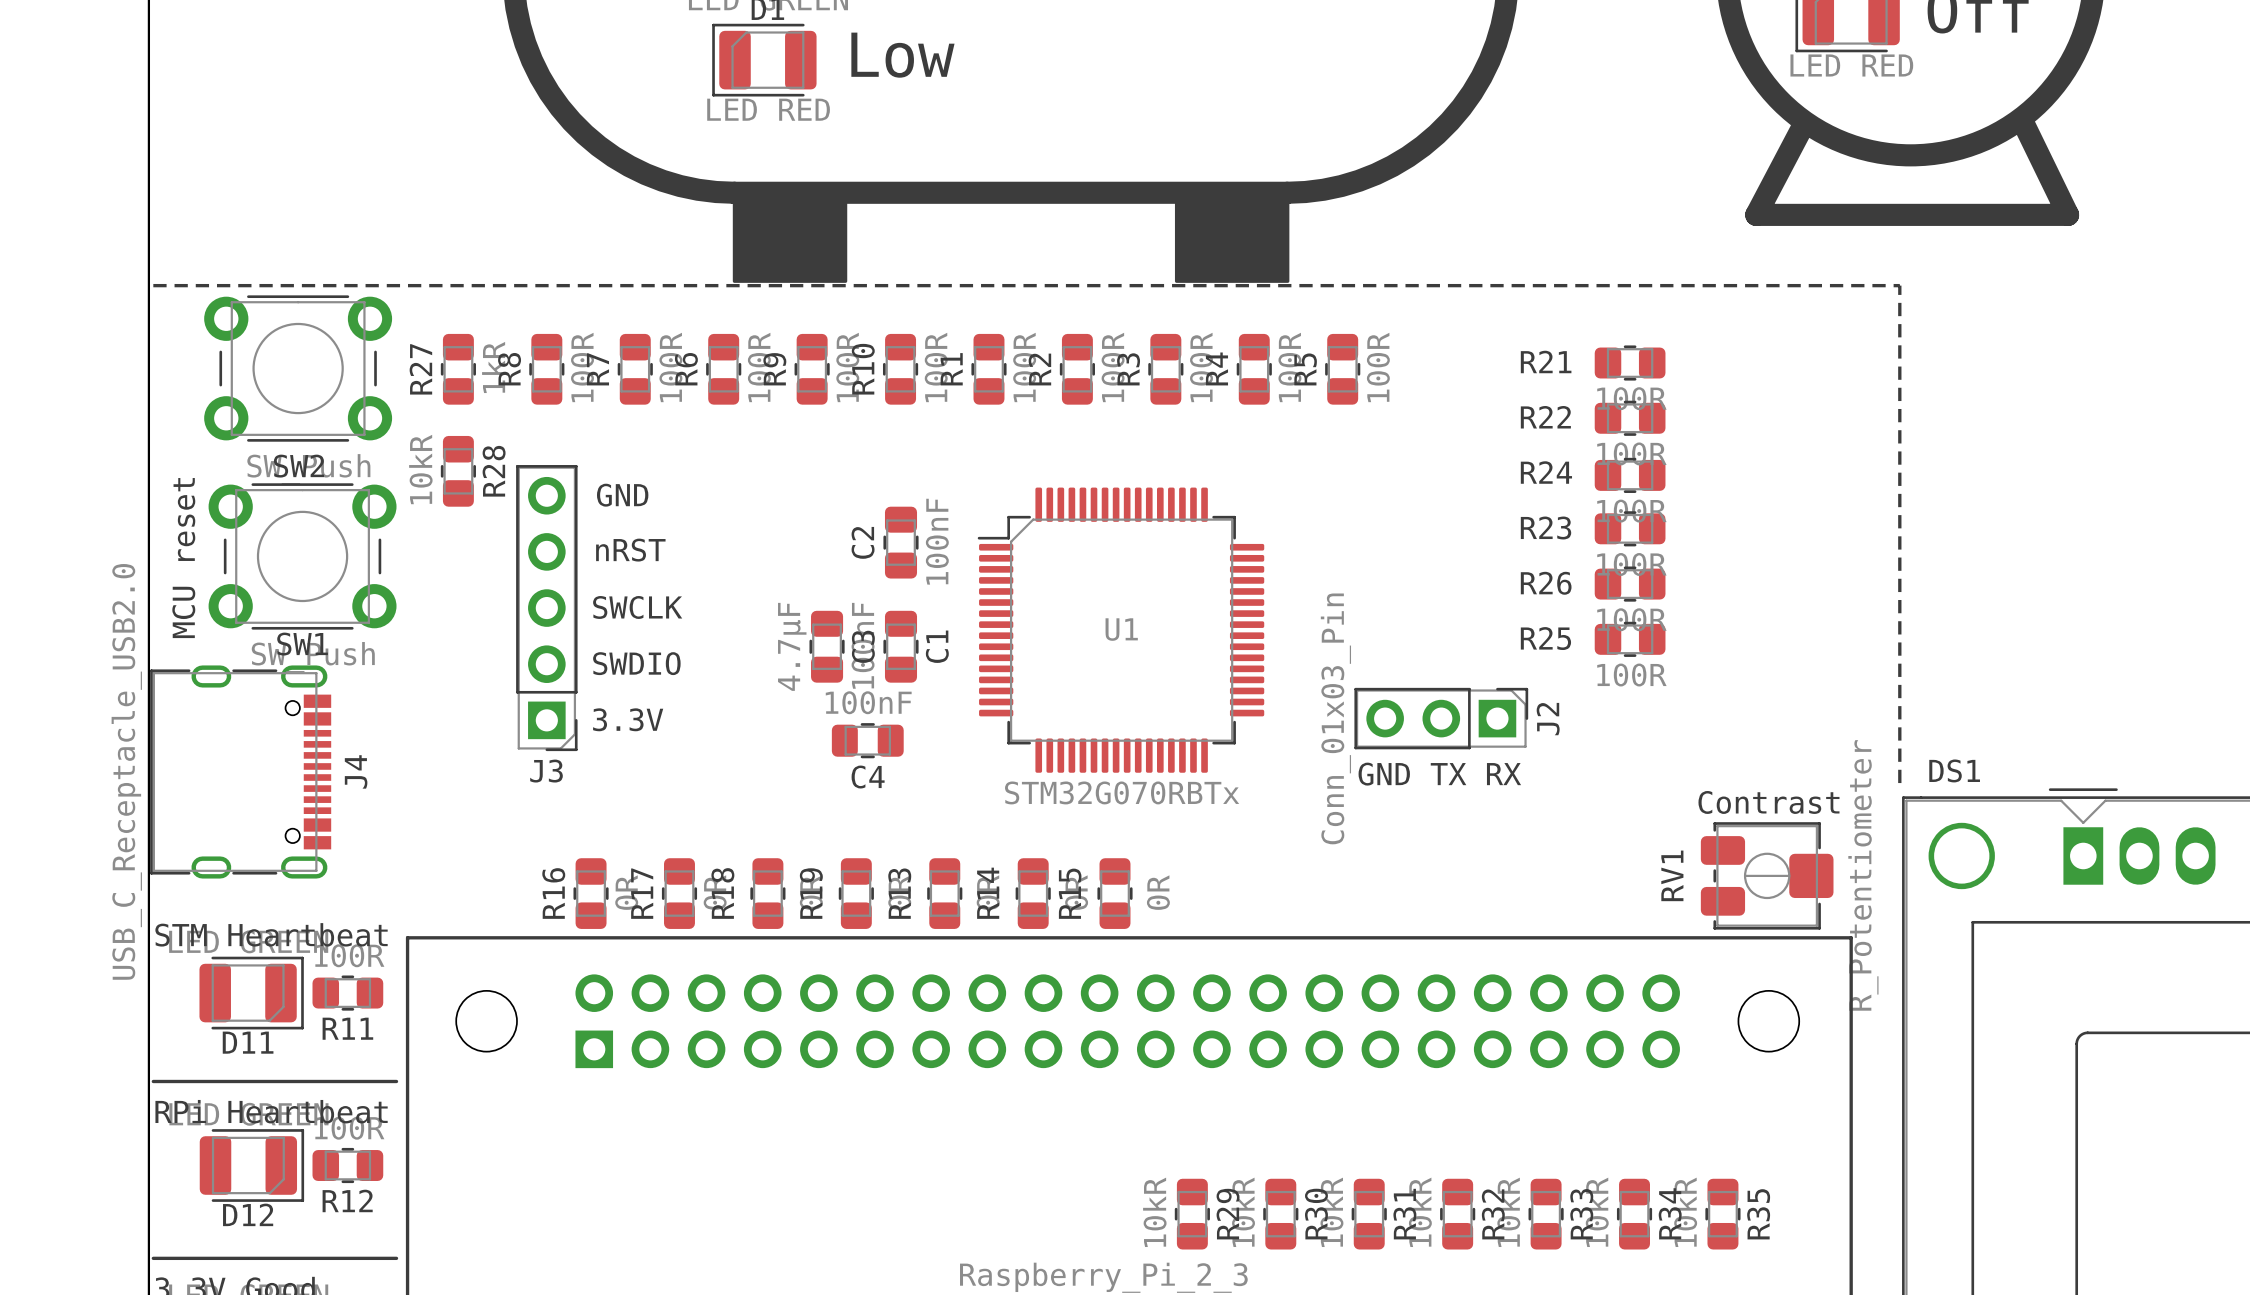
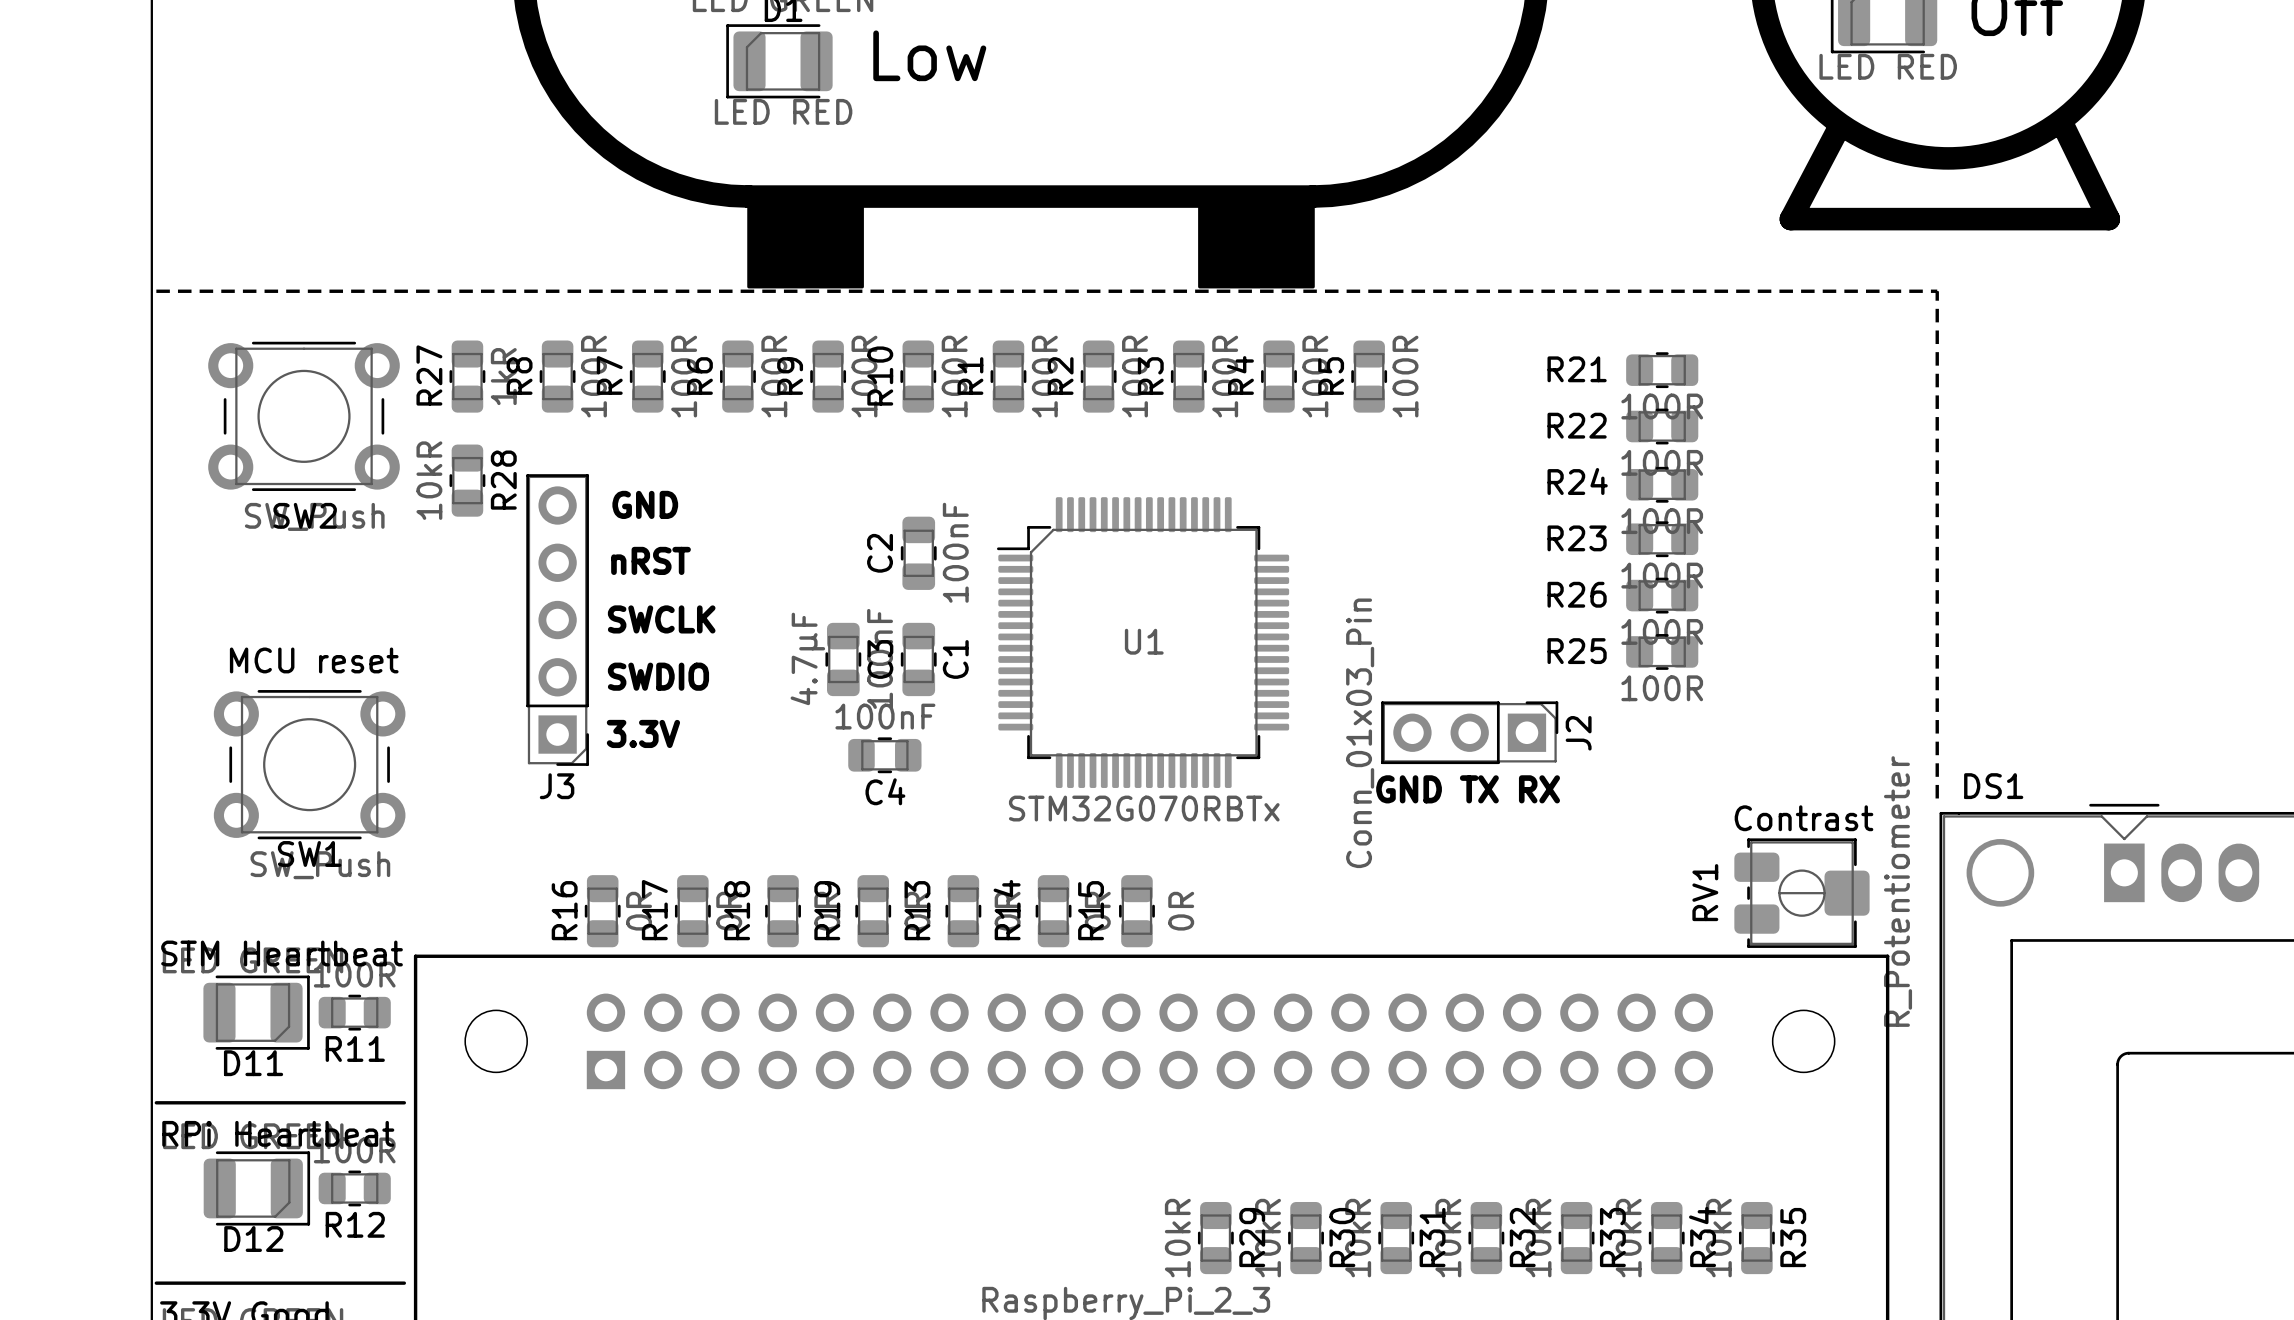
SW2 position: (298, 368) -> (304, 416)
SW1 position: (302, 556) -> (309, 764)
text rotation: 0° (183, 558) -> 90° clockwise (314, 660)
J4: USB_C_Receptacle_USB2.0 (240, 771) -> none

